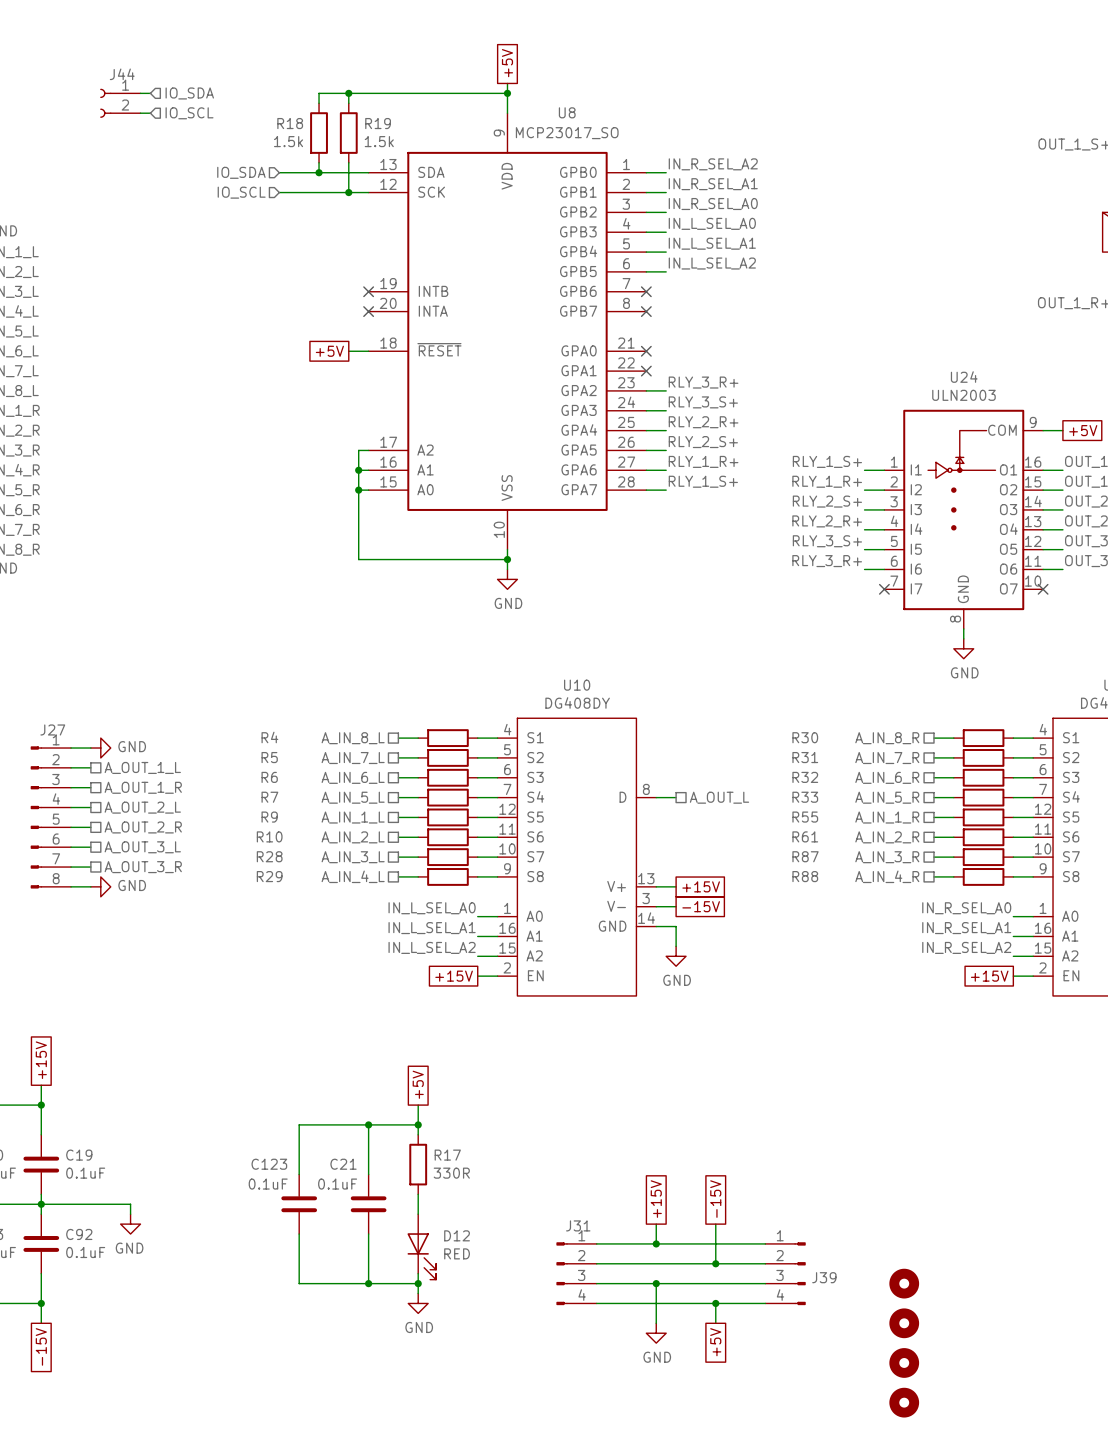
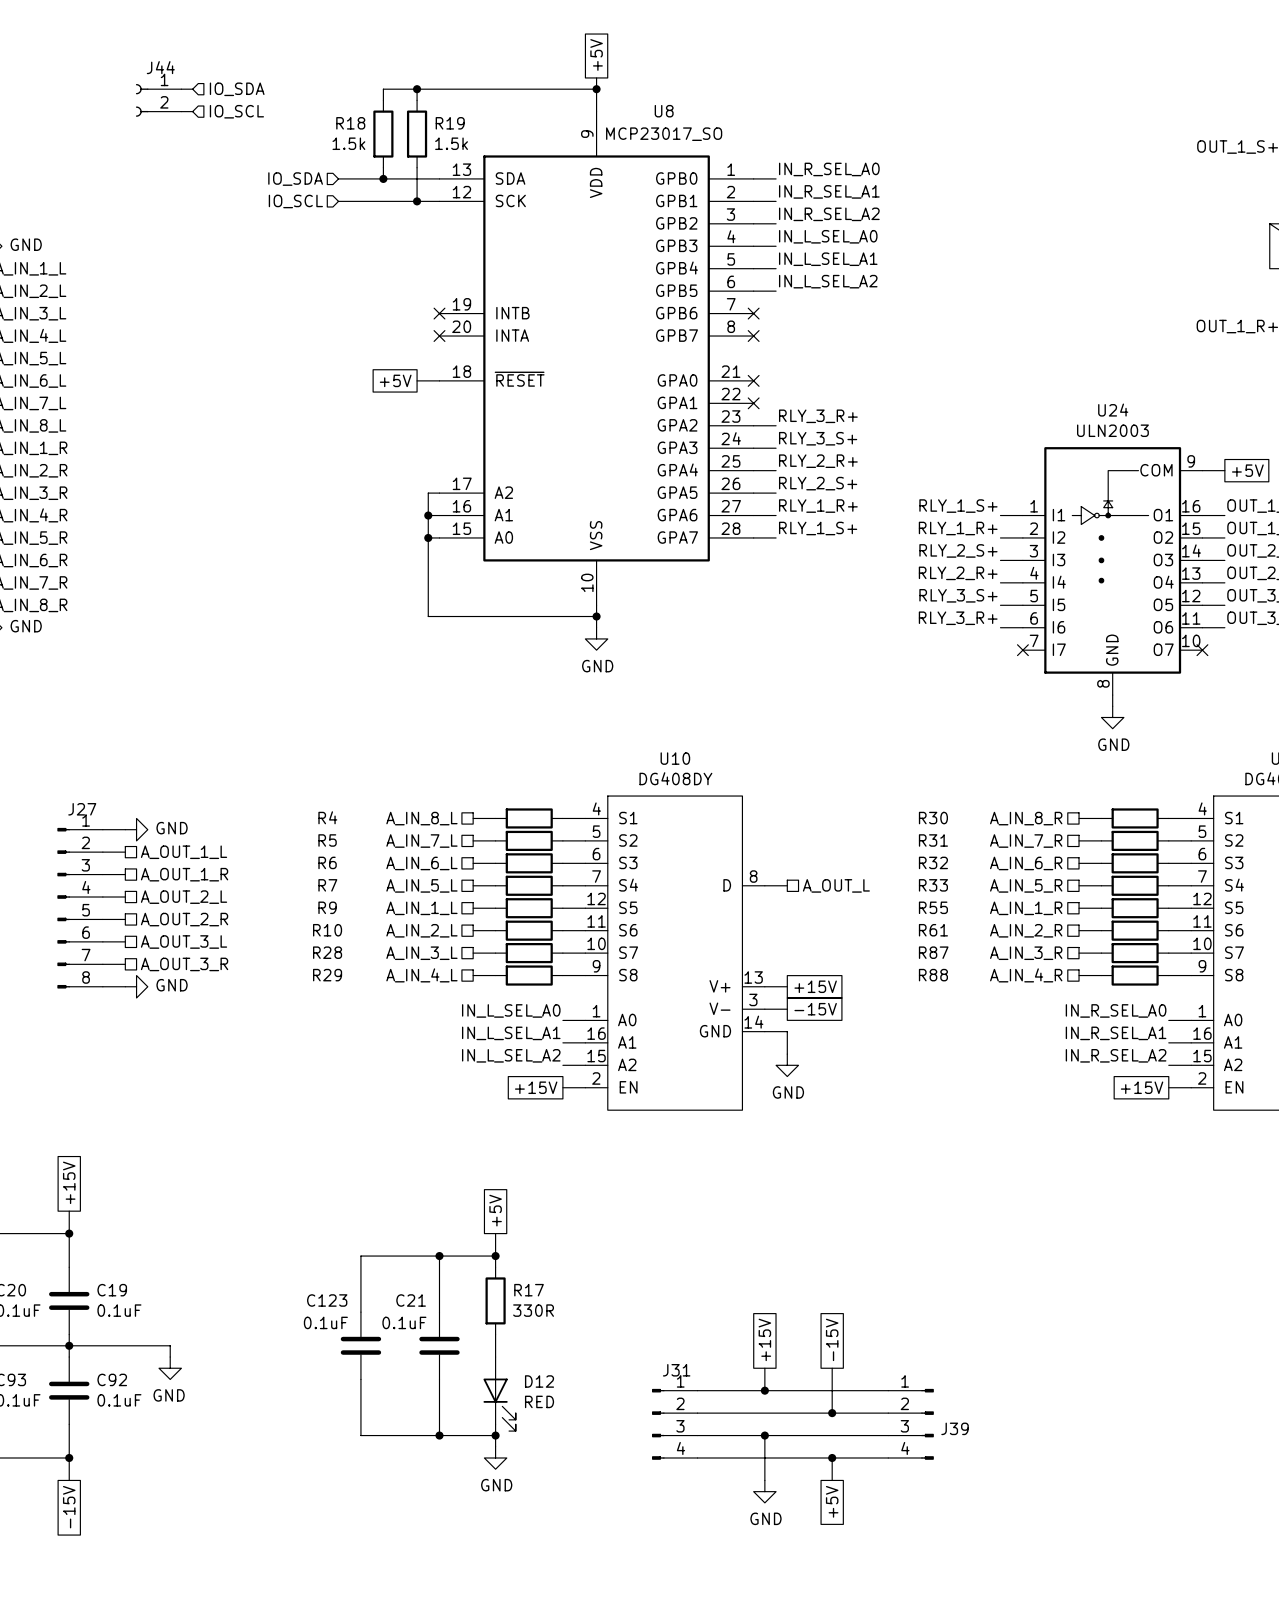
label: IN_R_SEL_A2 (713, 164) -> IN_R_SEL_A0 (829, 169)
label: IN_R_SEL_A0 (713, 204) -> IN_R_SEL_A2 (829, 214)
part: (904, 1283) -> none
part: (904, 1323) -> none
part: (904, 1362) -> none
part: (904, 1402) -> none

